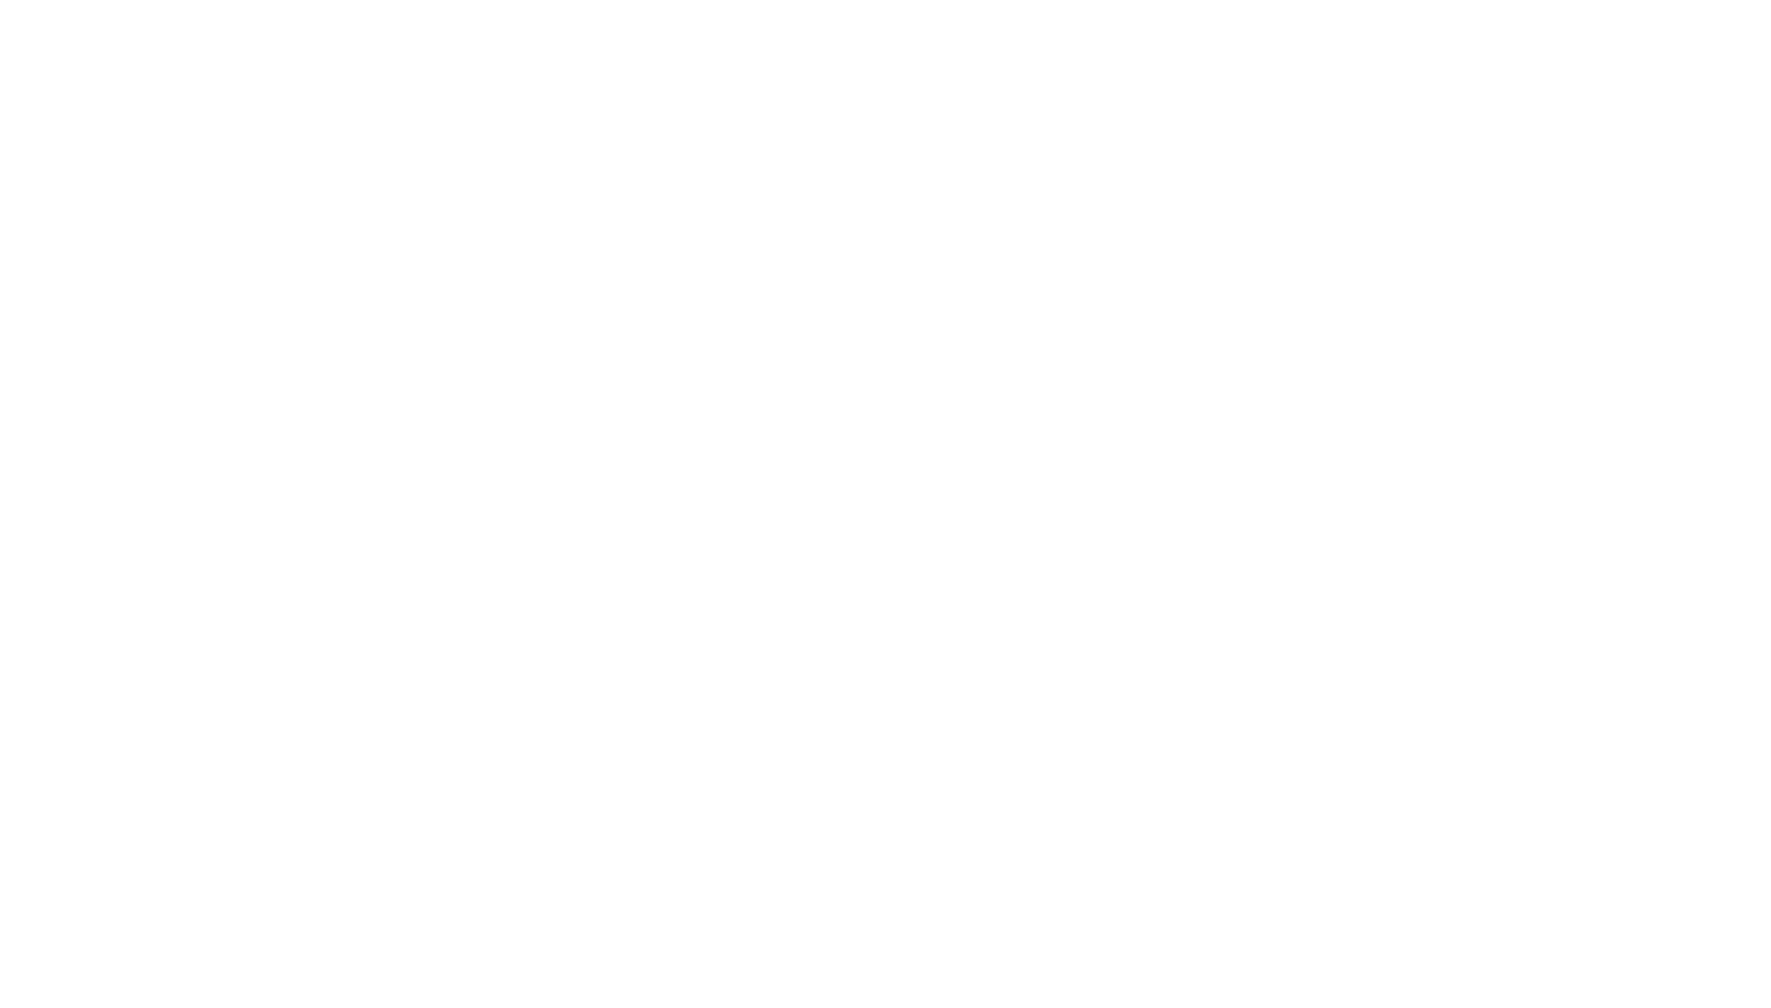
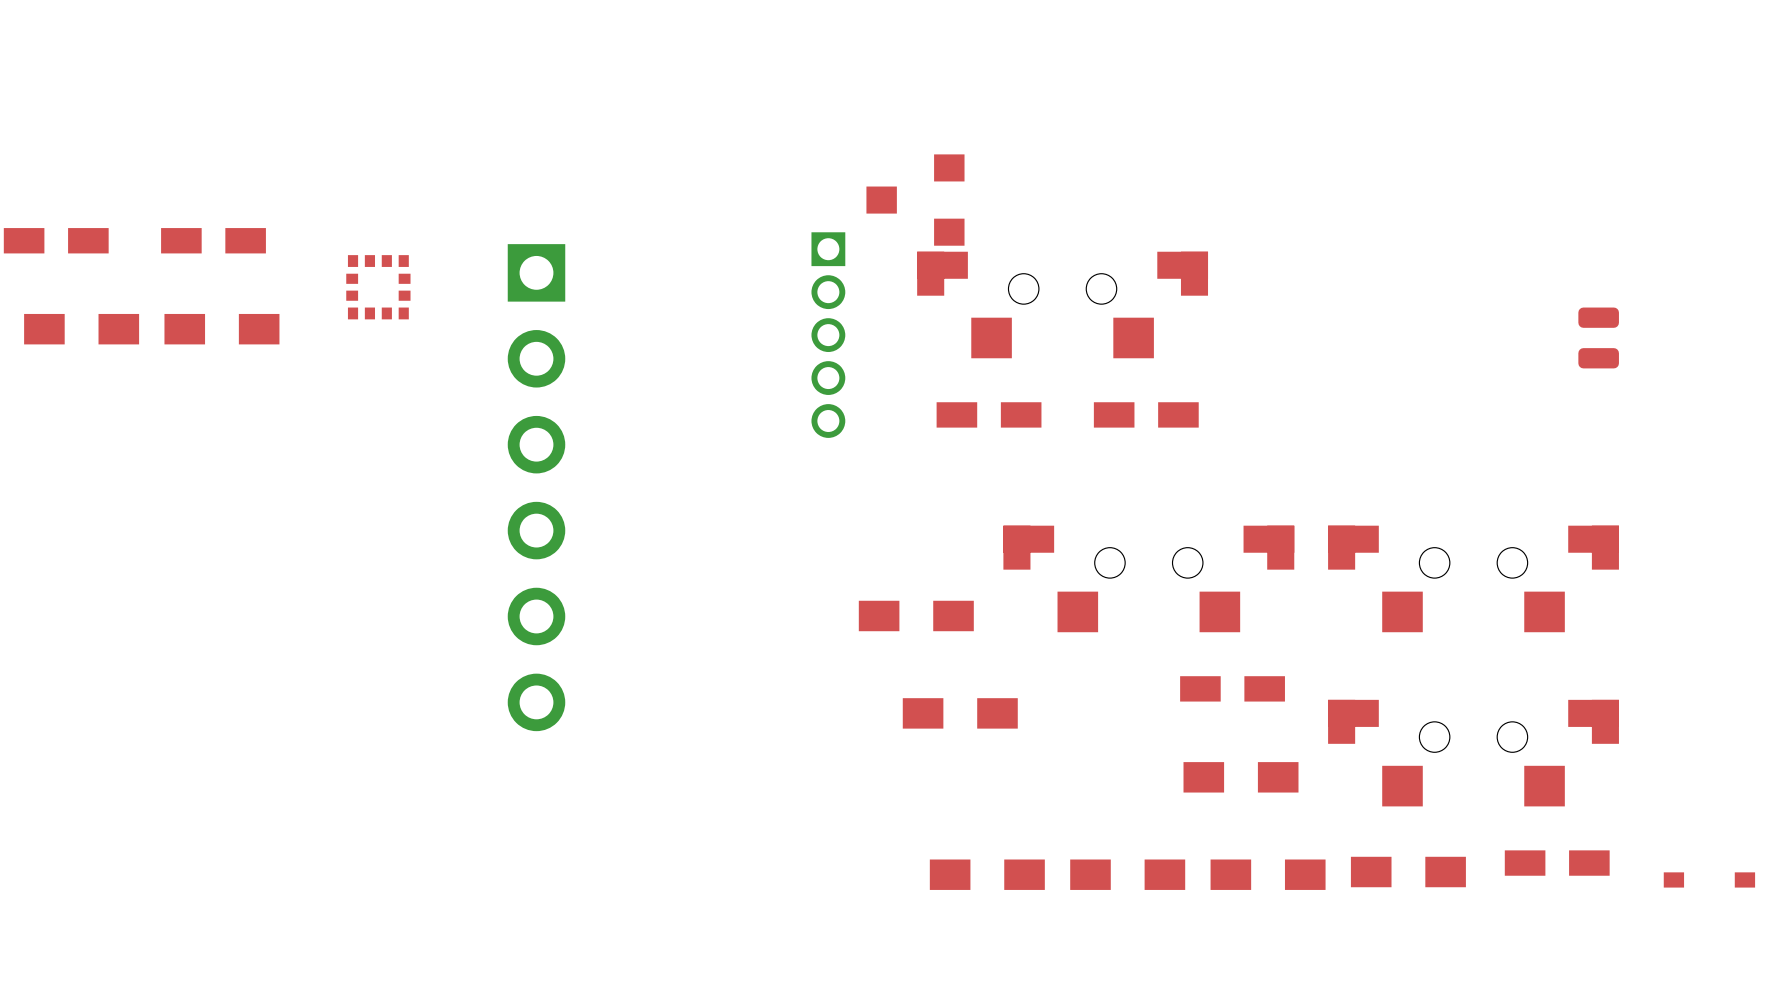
part: none -> (915, 200)
part: none -> (56, 240)
part: none -> (213, 240)
part: none -> (378, 287)
part: none -> (1062, 305)
part: none -> (81, 329)
part: none -> (221, 329)
part: none -> (828, 335)
part: none -> (1598, 337)
part: none -> (989, 414)
part: none -> (1146, 414)
part: none -> (536, 487)
part: none -> (1148, 578)
part: none -> (1473, 578)
part: none -> (916, 615)
part: none -> (1232, 688)
part: none -> (960, 713)
part: none -> (1473, 753)
part: none -> (1241, 777)
part: none -> (1557, 863)
part: none -> (1408, 872)
part: none -> (987, 874)
part: none -> (1127, 874)
part: none -> (1268, 874)
part: none -> (1709, 879)

